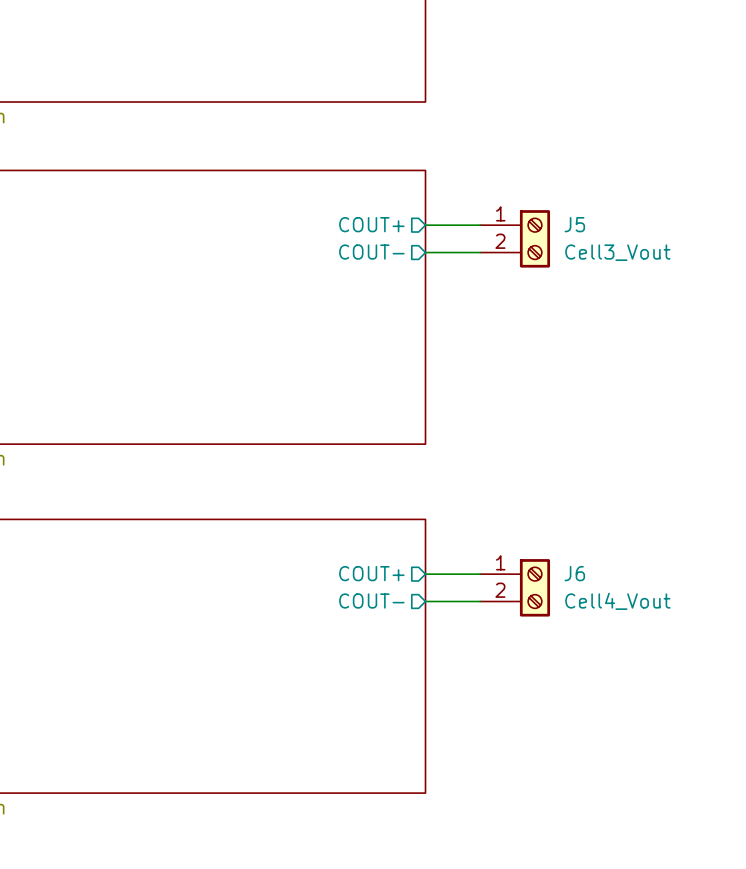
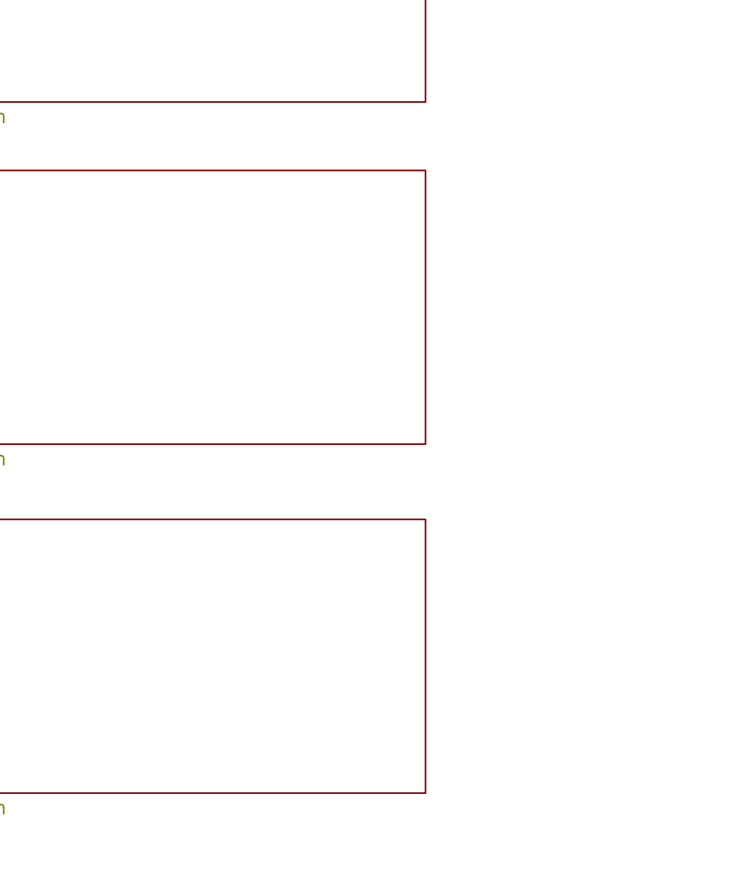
sheet pin: COUT+ (371, 224) -> none
wire: (425, 225) (480, 225) -> none
J5: Cell3_Vout (515, 238) -> none
sheet pin: COUT- (371, 252) -> none
wire: (425, 252) (480, 252) -> none
sheet pin: COUT+ (371, 573) -> none
wire: (425, 574) (480, 574) -> none
J6: Cell4_Vout (515, 587) -> none
sheet pin: COUT- (371, 600) -> none
wire: (425, 601) (480, 601) -> none

